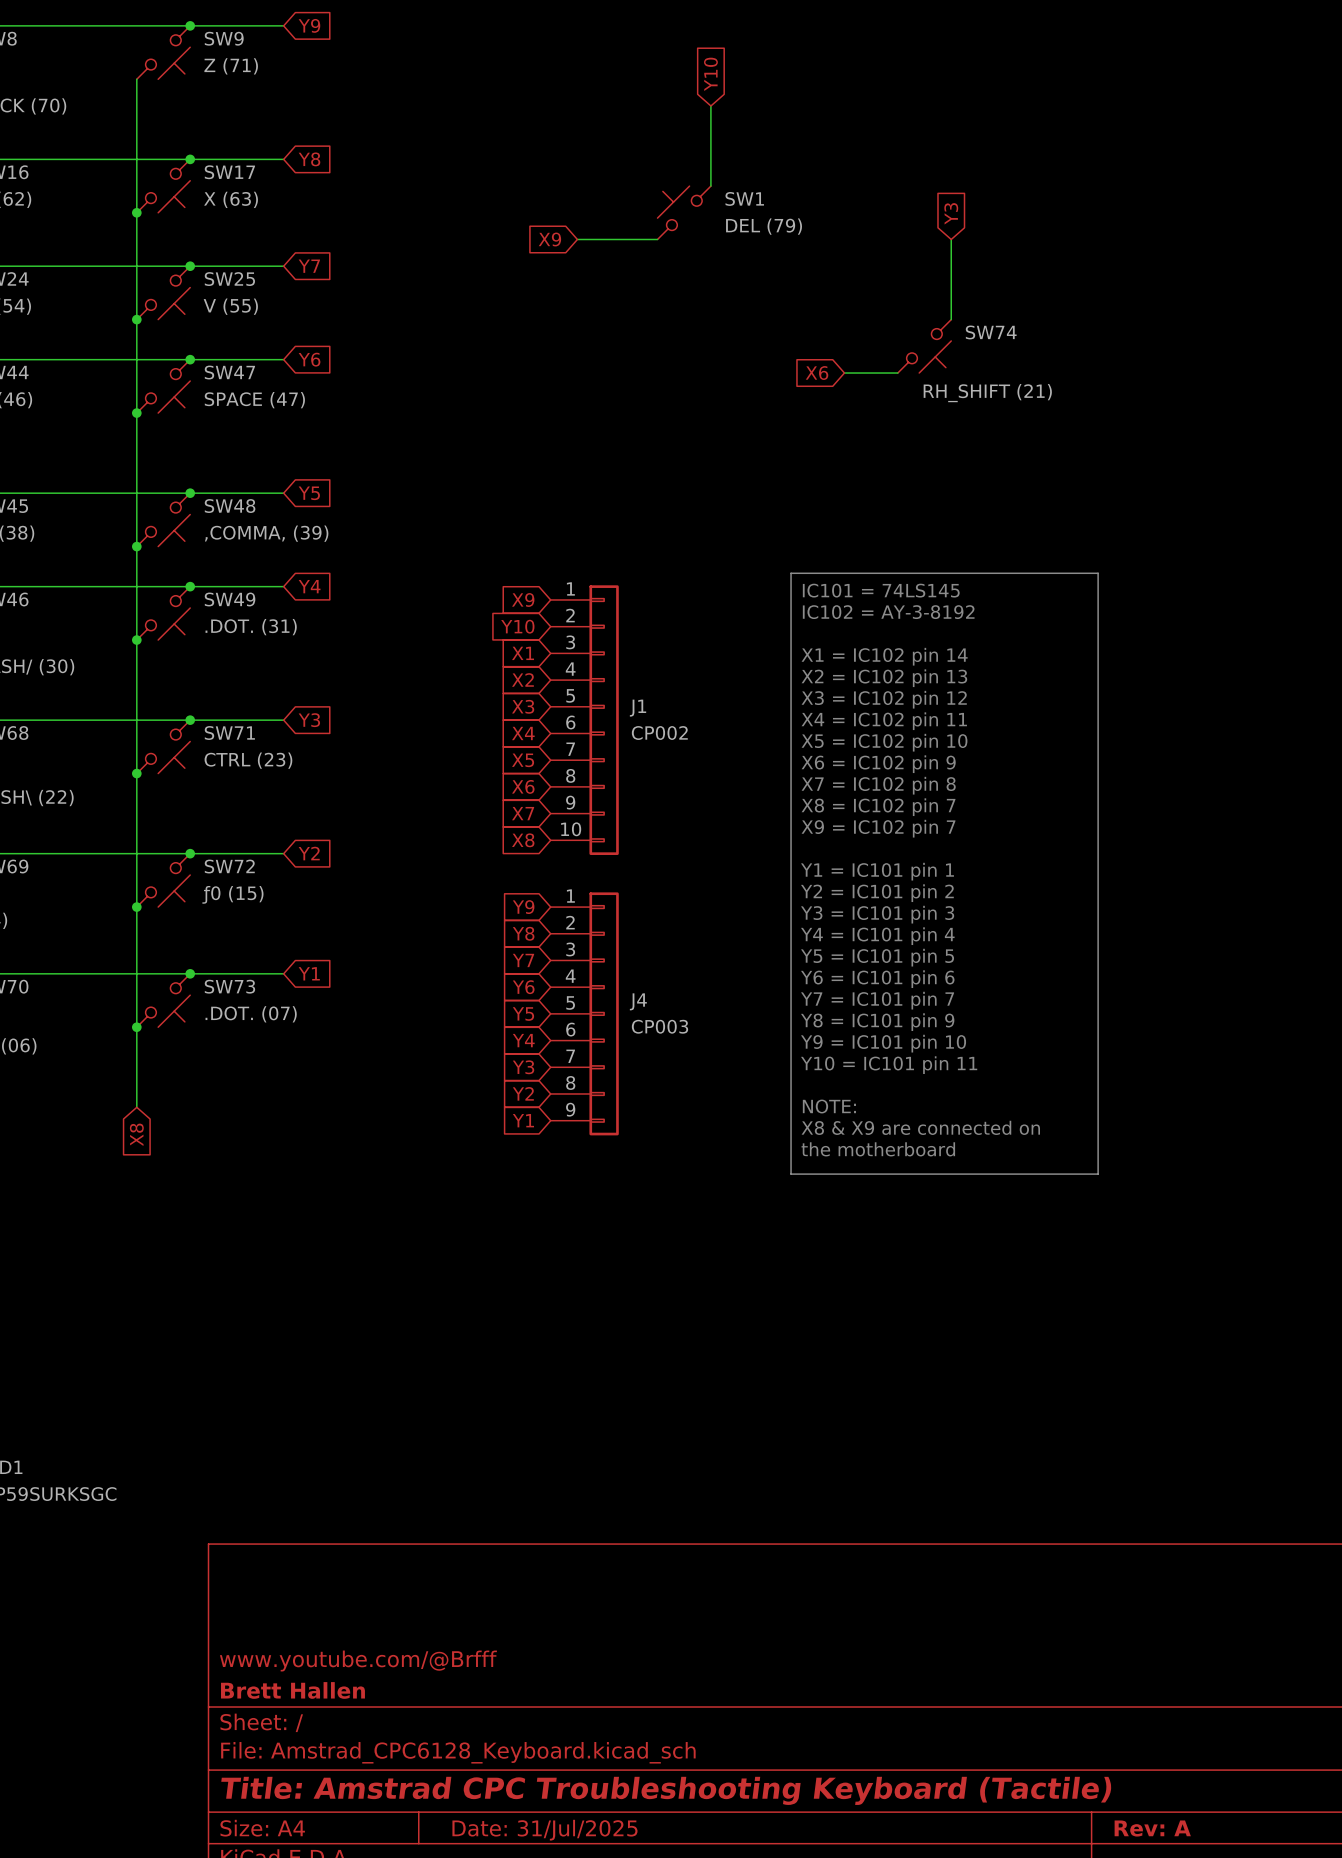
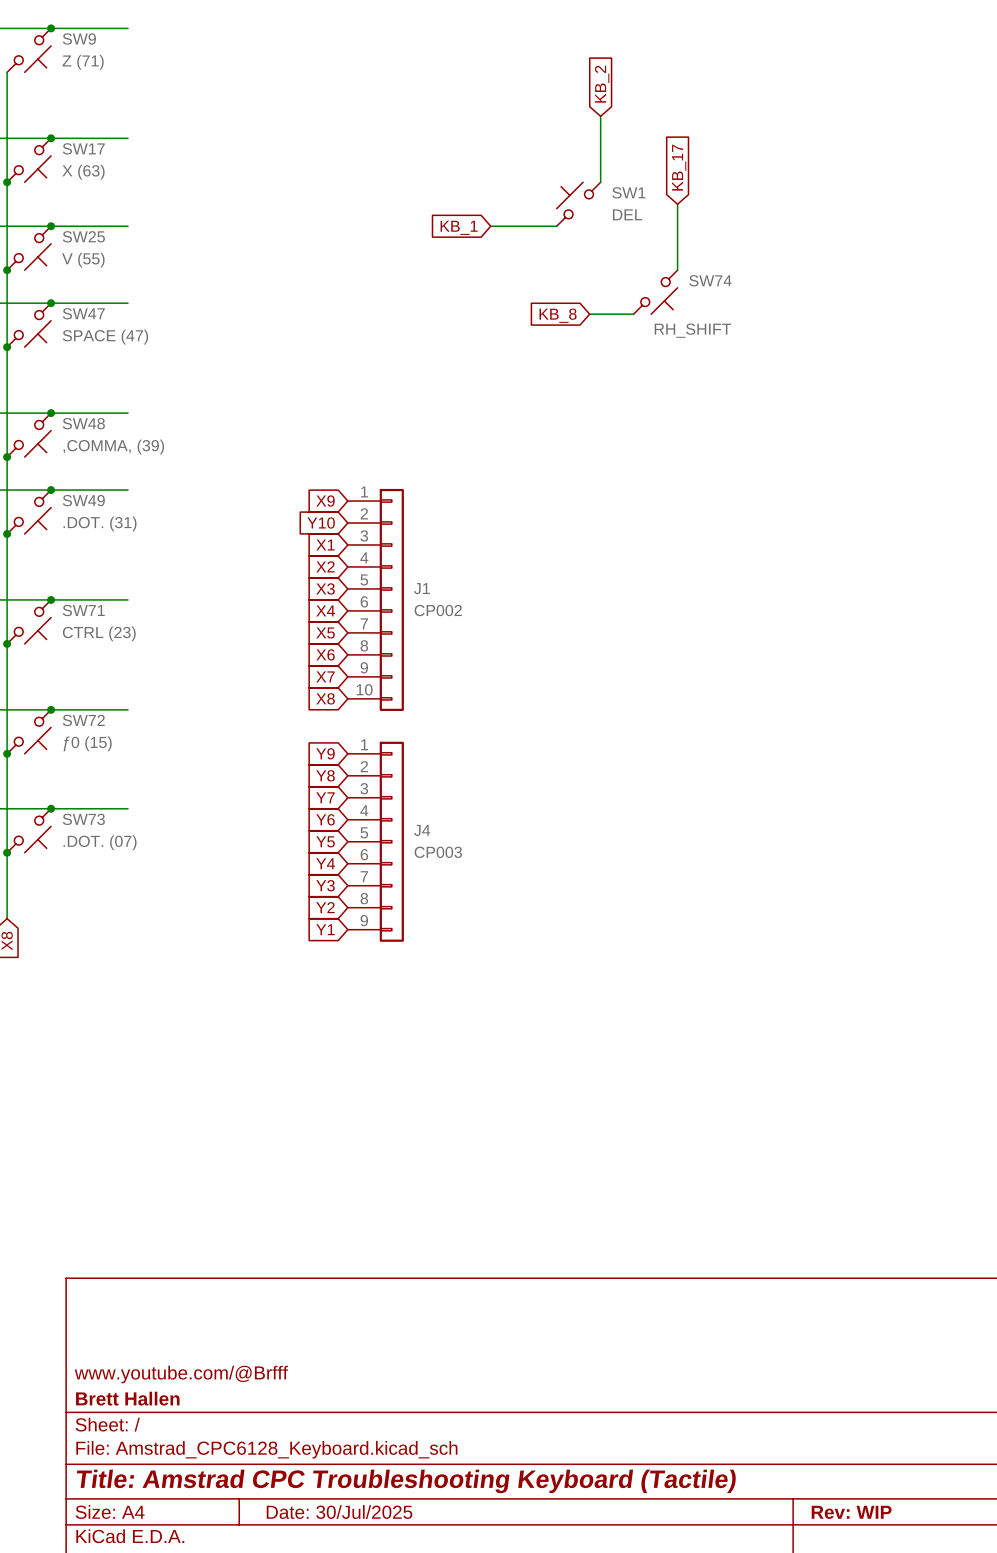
global label: Y9 (309, 25) -> none
global label: Y10 (710, 74) -> none
global label: none -> KB_2 (602, 84)
wire: (710, 105) (710, 186) -> (600, 116) (600, 182)
global label: Y8 (309, 159) -> none
SW1 position: (684, 212) -> (578, 204)
global label: Y3 (951, 213) -> KB_17 (679, 167)
SW1 value: DEL (79) (764, 226) -> DEL (627, 214)
global label: X9 (549, 239) -> none
wire: (577, 239) (657, 239) -> (490, 226) (556, 226)
global label: Y7 (309, 266) -> none
global label: none -> KB_1 (459, 227)
global label: Y6 (309, 359) -> none
global label: X6 (817, 373) -> KB_8 (558, 315)
SW74 value: RH_SHIFT (21) (987, 393) -> RH_SHIFT (692, 330)
global label: Y5 (309, 493) -> none
line: (791, 573) (1098, 573) (1098, 1174) (791, 1174) (791, 573) -> none
global label: Y4 (309, 586) -> none
text: IC101 = 74LS145 (881, 590) -> none
text: IC102 = AY-3-8192 (888, 612) -> none
text: X1 = IC102 pin 14 (884, 656) -> none
text: X2 = IC102 pin 13 (884, 678) -> none
text: X3 = IC102 pin 12 (884, 699) -> none
global label: Y3 (309, 720) -> none
text: X4 = IC102 pin 11 (884, 721) -> none
text: X5 = IC102 pin 10 (884, 742) -> none
text: X6 = IC102 pin 9 (878, 764) -> none
text: X7 = IC102 pin 8 (878, 785) -> none
text: X8 = IC102 pin 7 (878, 807) -> none
text: X9 = IC102 pin 7 (878, 828) -> none
global label: Y2 (309, 853) -> none
text: Y1 = IC101 pin 1 (877, 871) -> none
text: Y2 = IC101 pin 2 (877, 893) -> none
text: Y3 = IC101 pin 3 (877, 914) -> none
text: Y4 = IC101 pin 4 (877, 936) -> none
text: Y5 = IC101 pin 5 (877, 957) -> none
global label: Y1 (309, 973) -> none
text: Y6 = IC101 pin 6 (877, 979) -> none
text: Y7 = IC101 pin 7 (877, 1000) -> none
text: Y8 = IC101 pin 9 (877, 1022) -> none
text: Y9 = IC101 pin 10 (883, 1043) -> none
text: Y10 = IC101 pin 11 (889, 1065) -> none
text: NOTE: (829, 1106) -> none
text: X8 & X9 are connected on (920, 1127) -> none
text: the motherboard (878, 1149) -> none
title block: Rev: A (1152, 1828) -> Rev: WIP (851, 1512)
title block: Date: 31/Jul/2025 (544, 1830) -> Date: 30/Jul/2025 (339, 1512)

